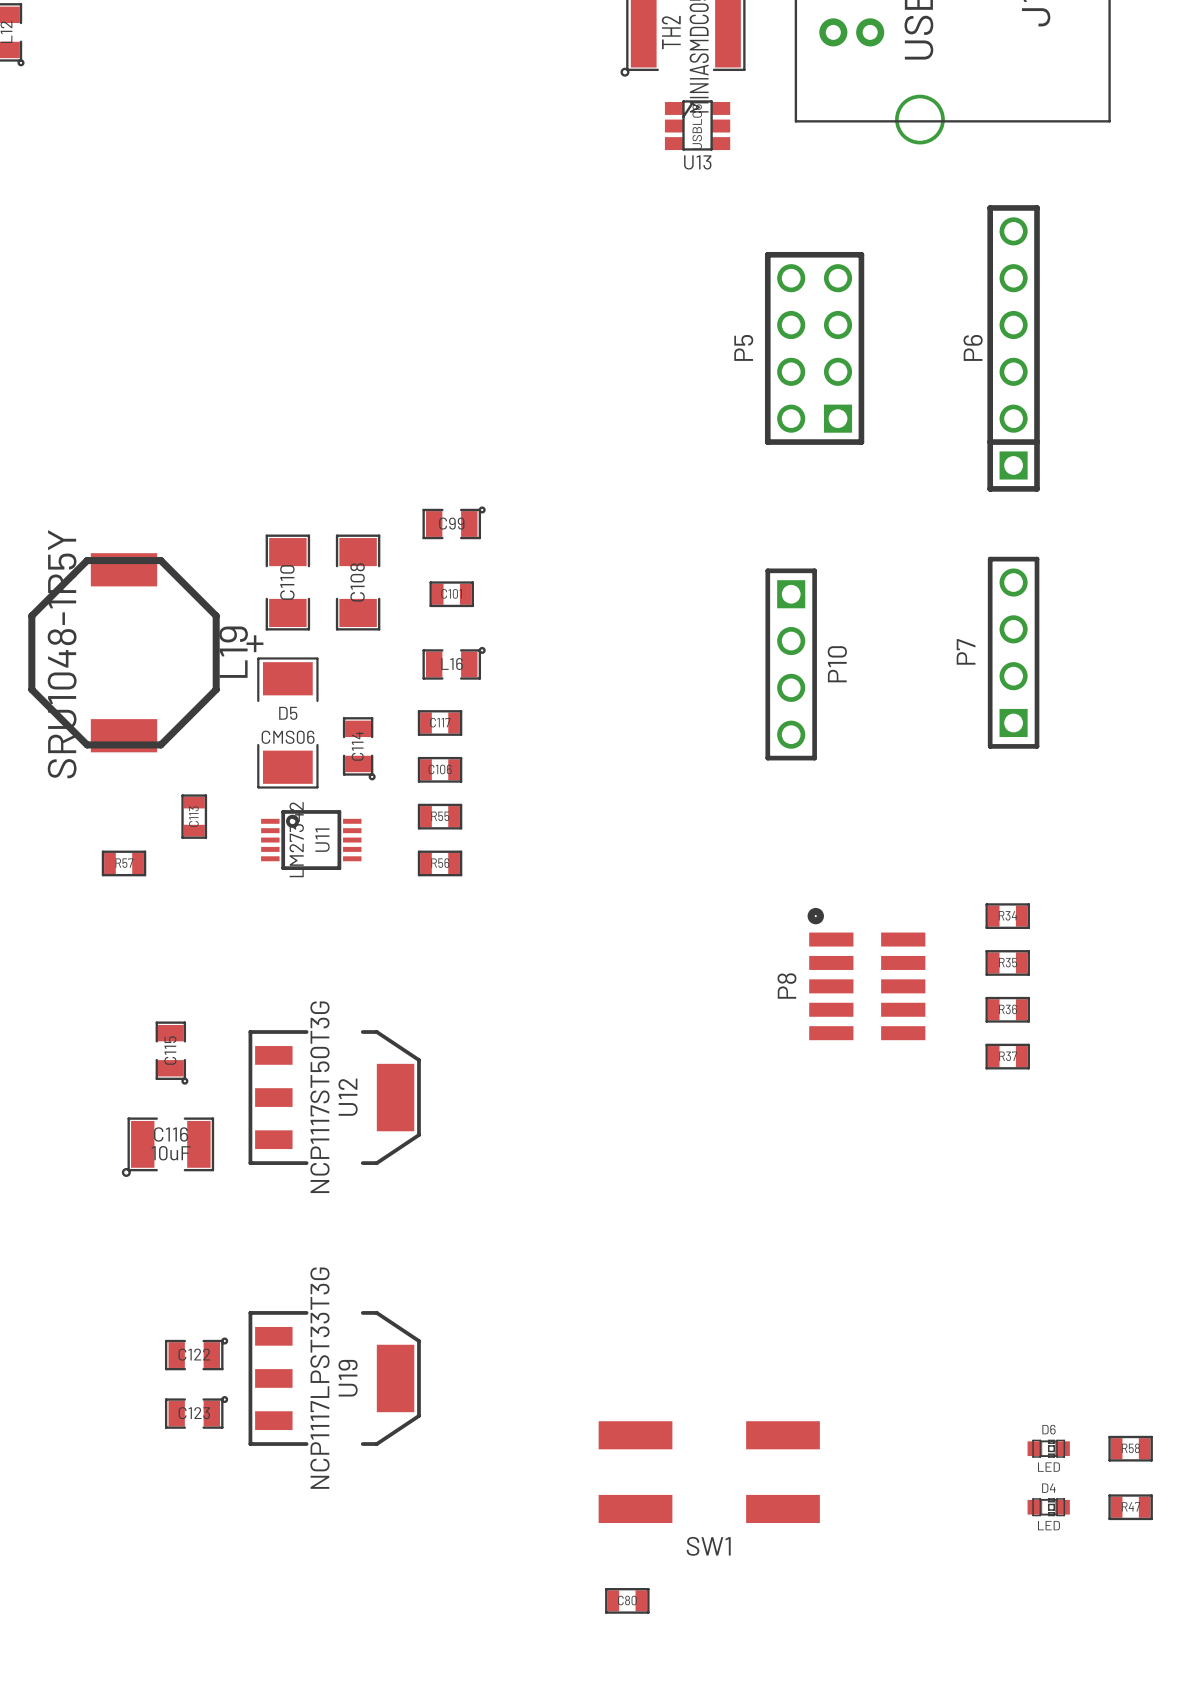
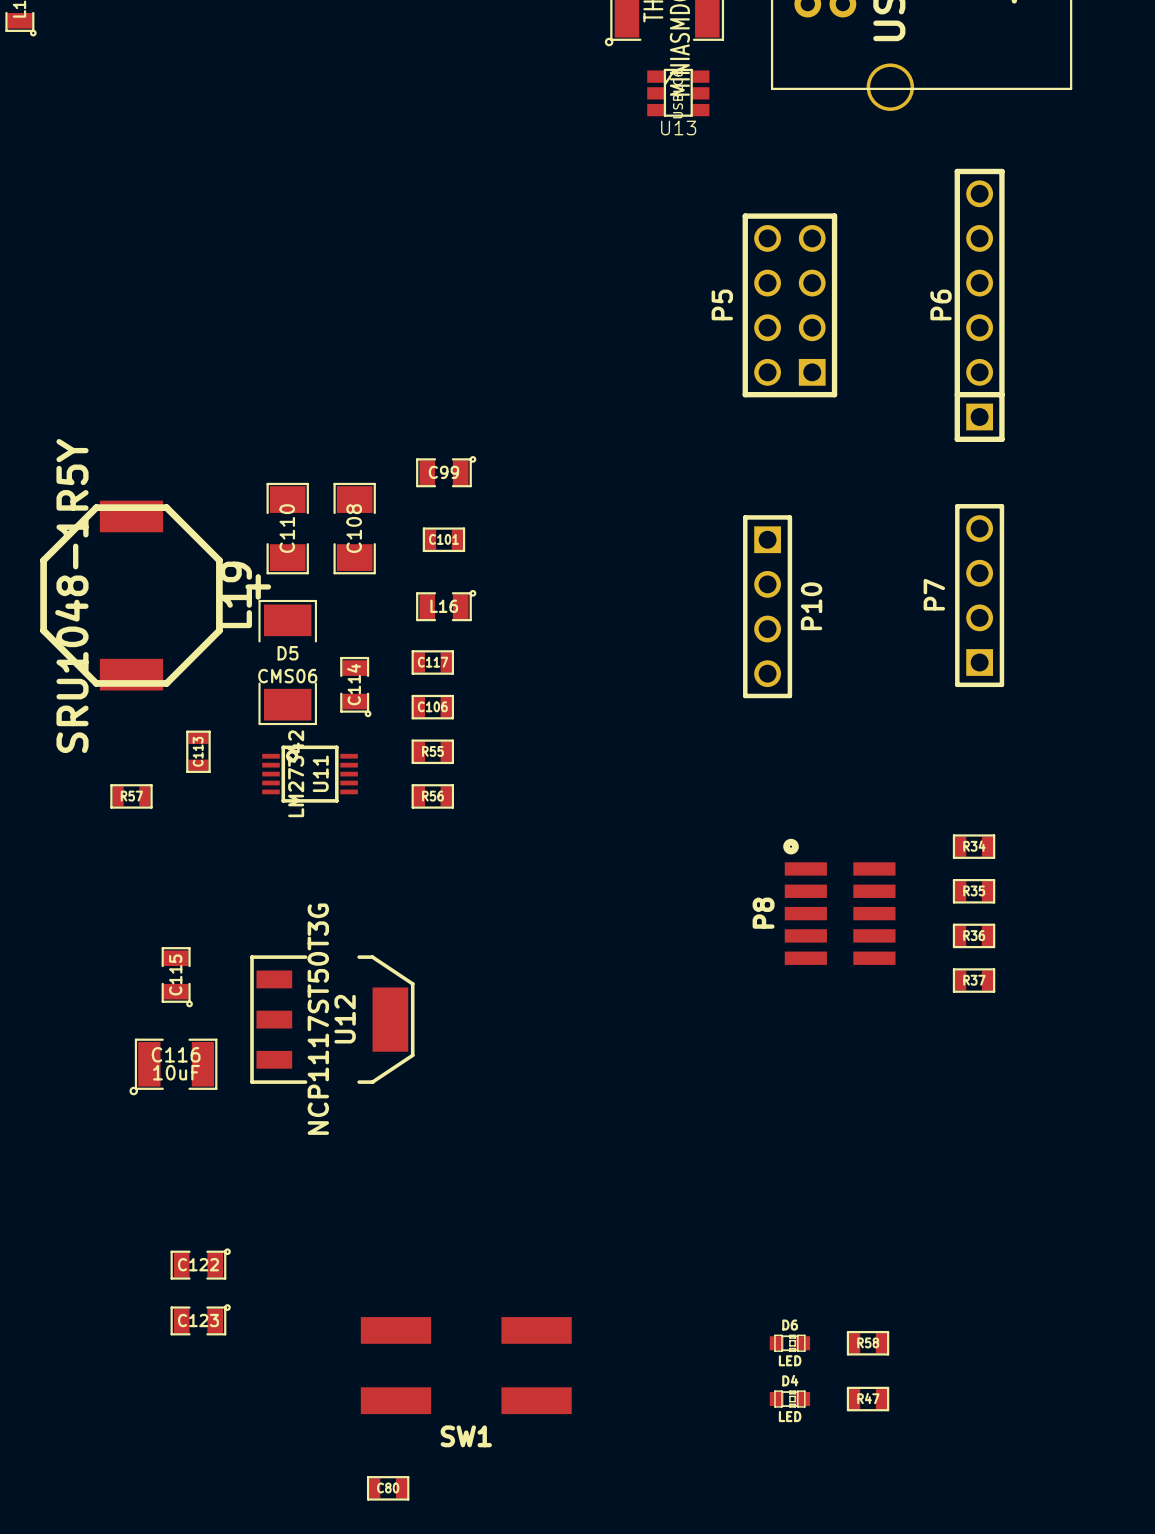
U19: NCP1117LPST33T3G (334, 1378) -> none
D6 position: (1048, 1448) -> (789, 1343)
R58 position: (1130, 1448) -> (868, 1343)
SW1 position: (709, 1472) -> (466, 1365)
D4 position: (1048, 1507) -> (789, 1399)
R47 position: (1130, 1507) -> (868, 1399)
C80 position: (627, 1600) -> (388, 1488)

